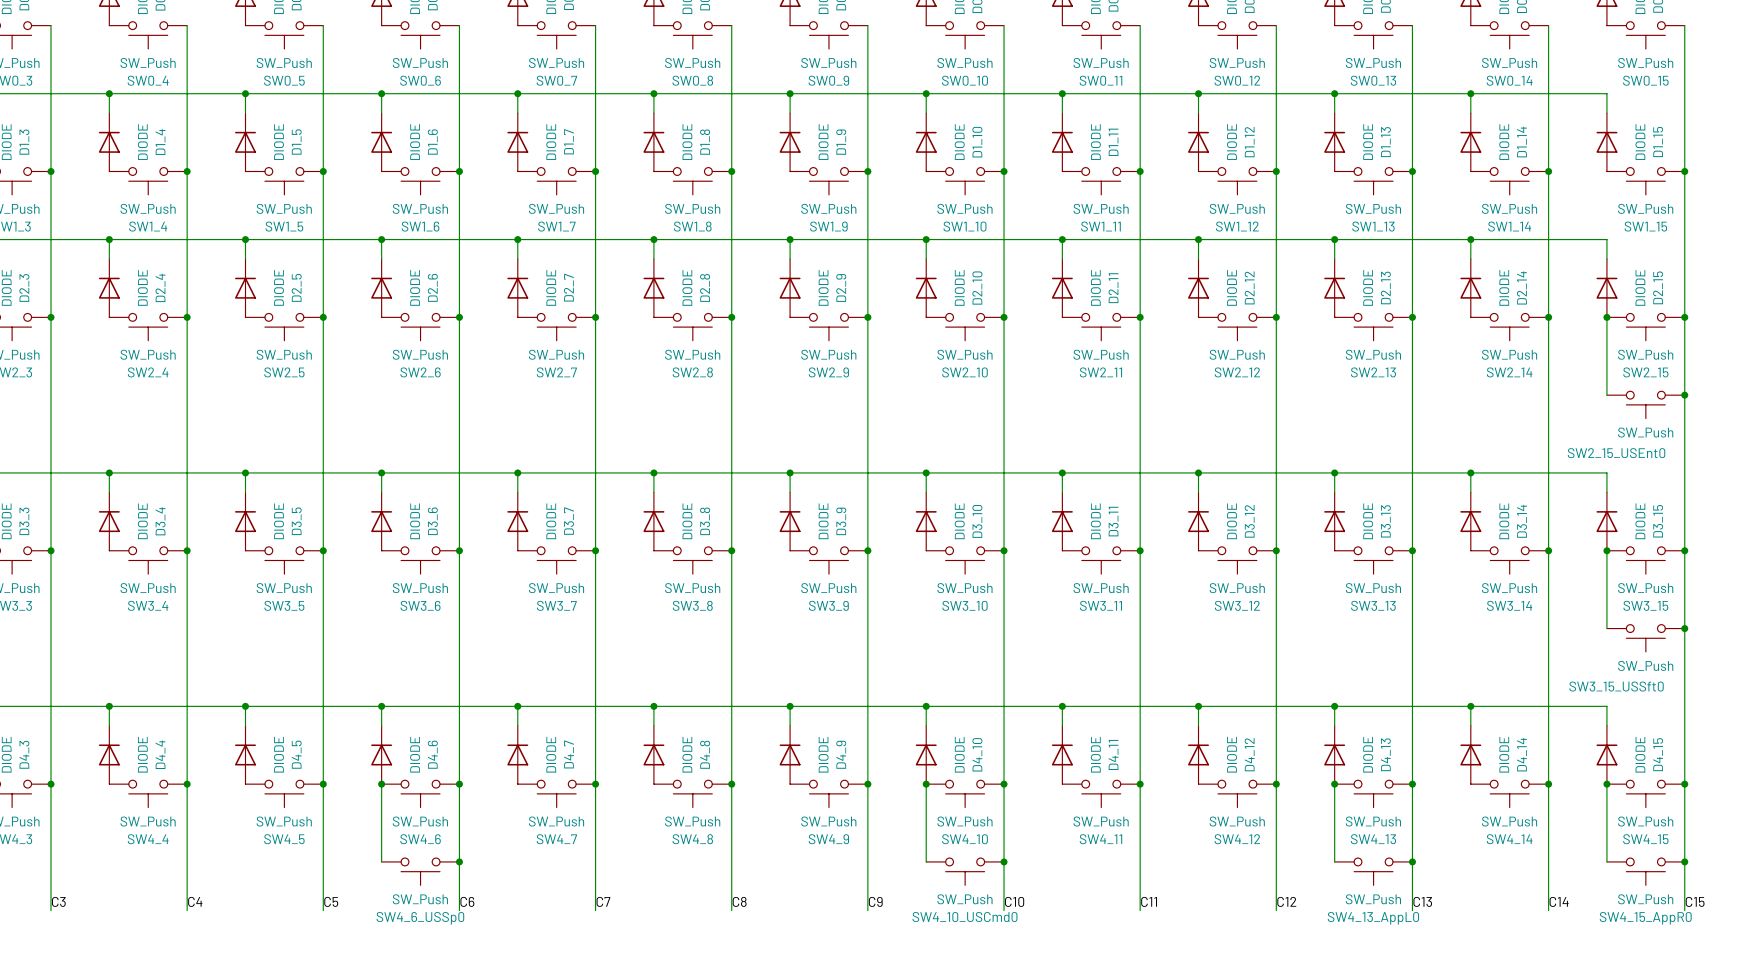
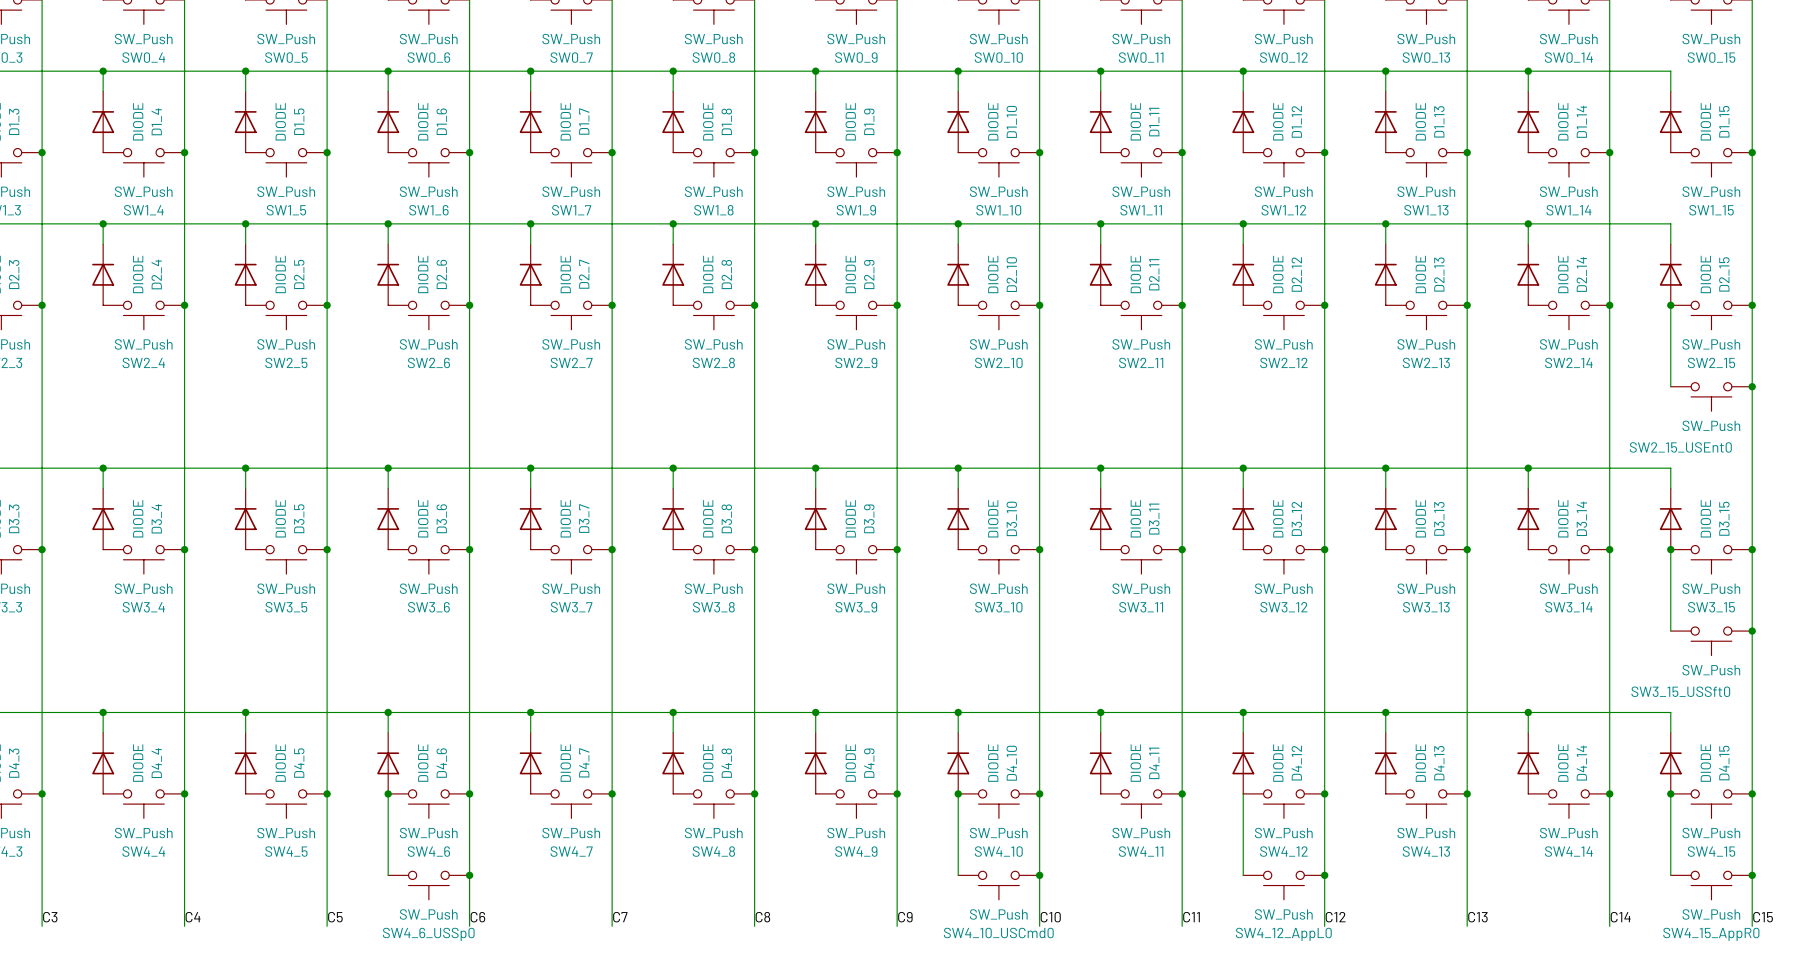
wire: (1334, 784) (1334, 861) -> (1243, 793) (1243, 875)
junction: (1334, 784) -> none
junction: none -> (1324, 875)
junction: (1412, 861) -> none
SW4_12_AppL0: none -> SW_Push (1283, 885)
SW4_13_AppL0: SW_Push (1373, 871) -> none

